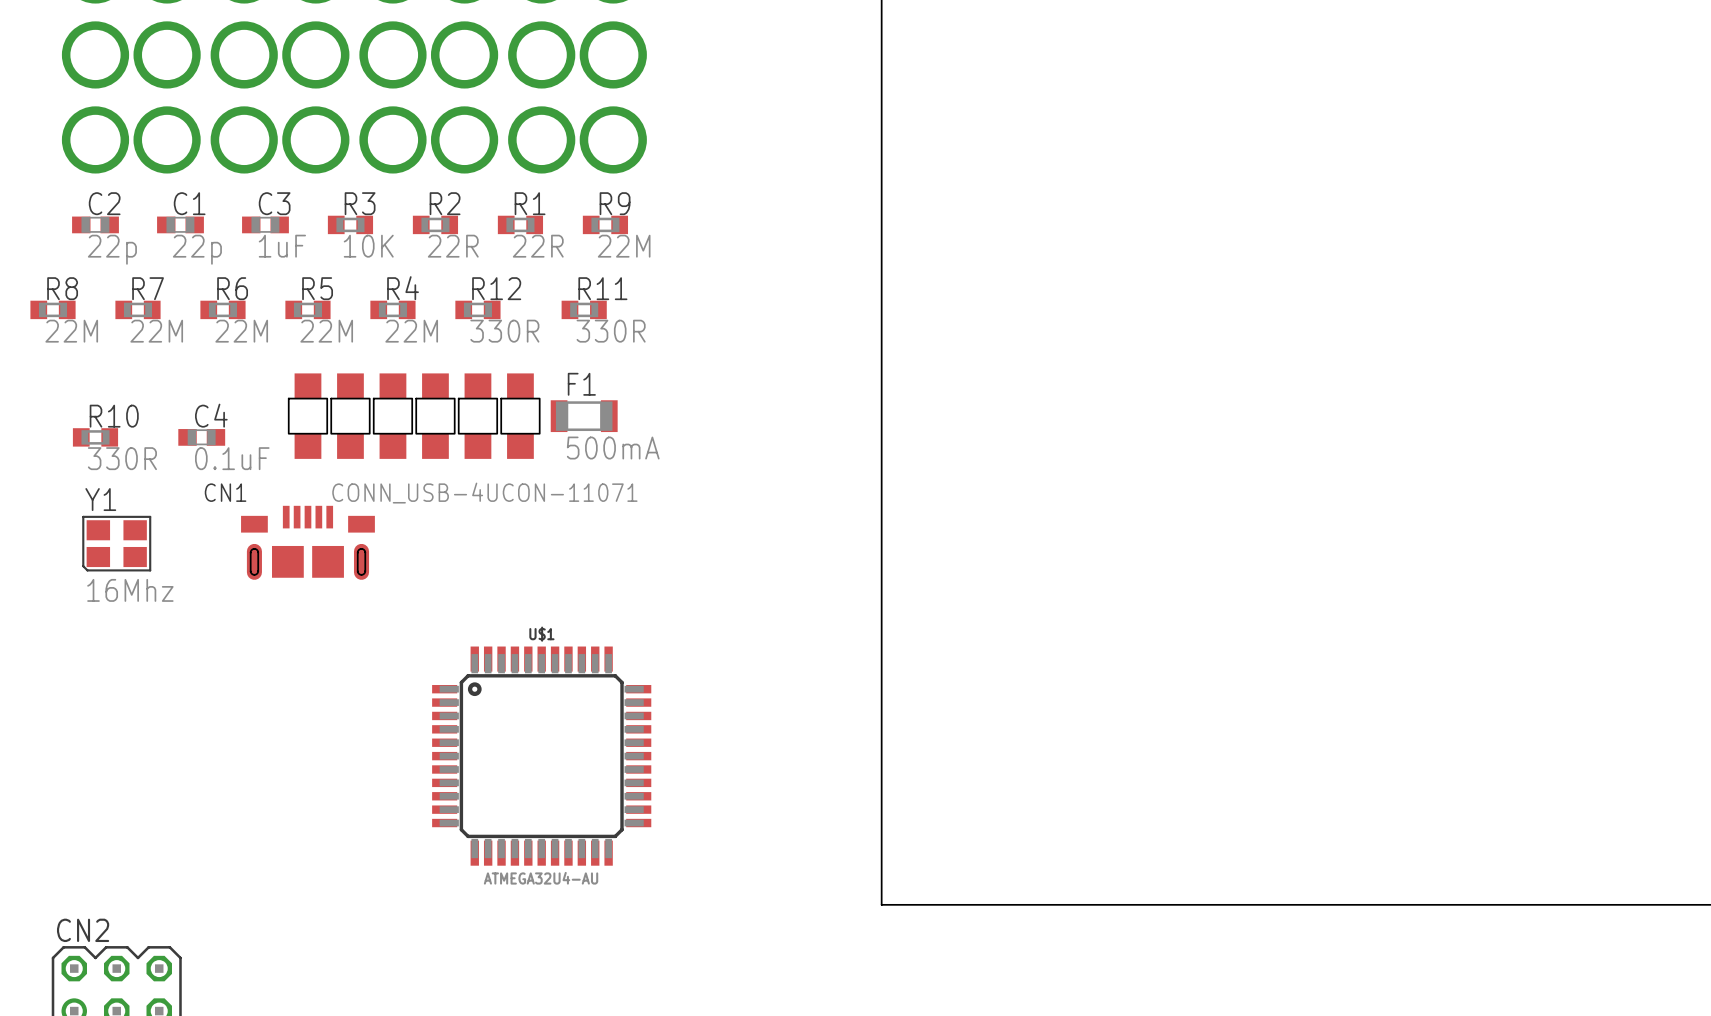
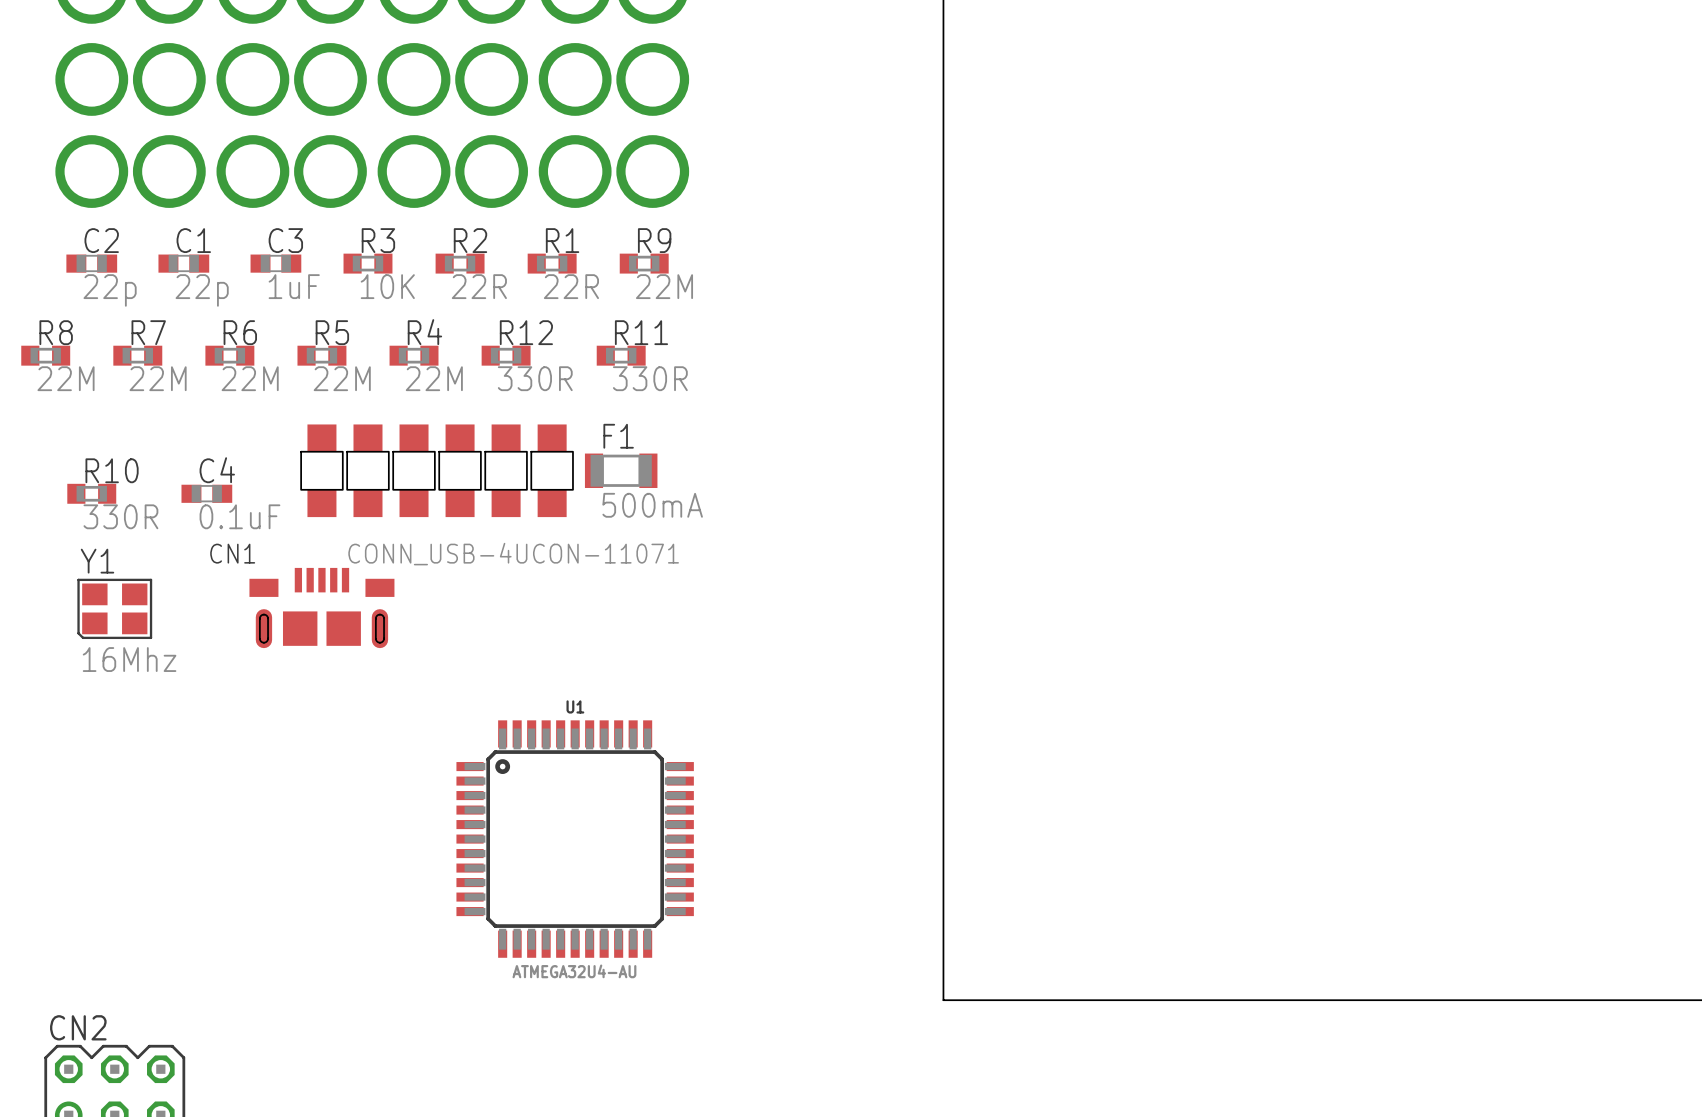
U$1 name: U$1 (541, 634) -> U1 (575, 706)

